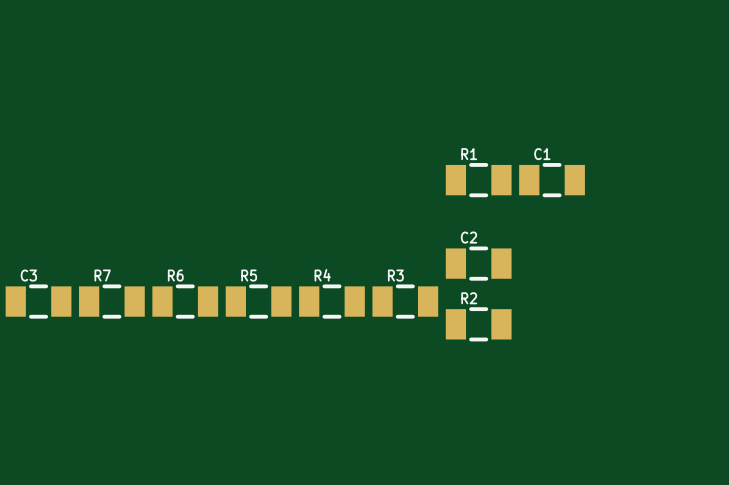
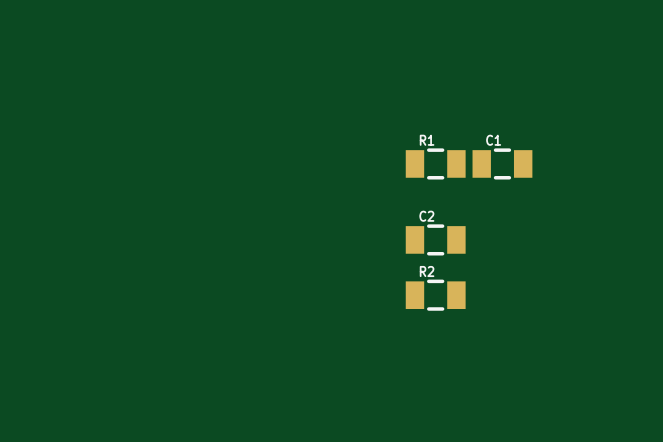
C3: (38, 301) -> none
R7: (111, 301) -> none
R6: (185, 301) -> none
R5: (258, 301) -> none
R4: (331, 301) -> none
R3: (405, 301) -> none

